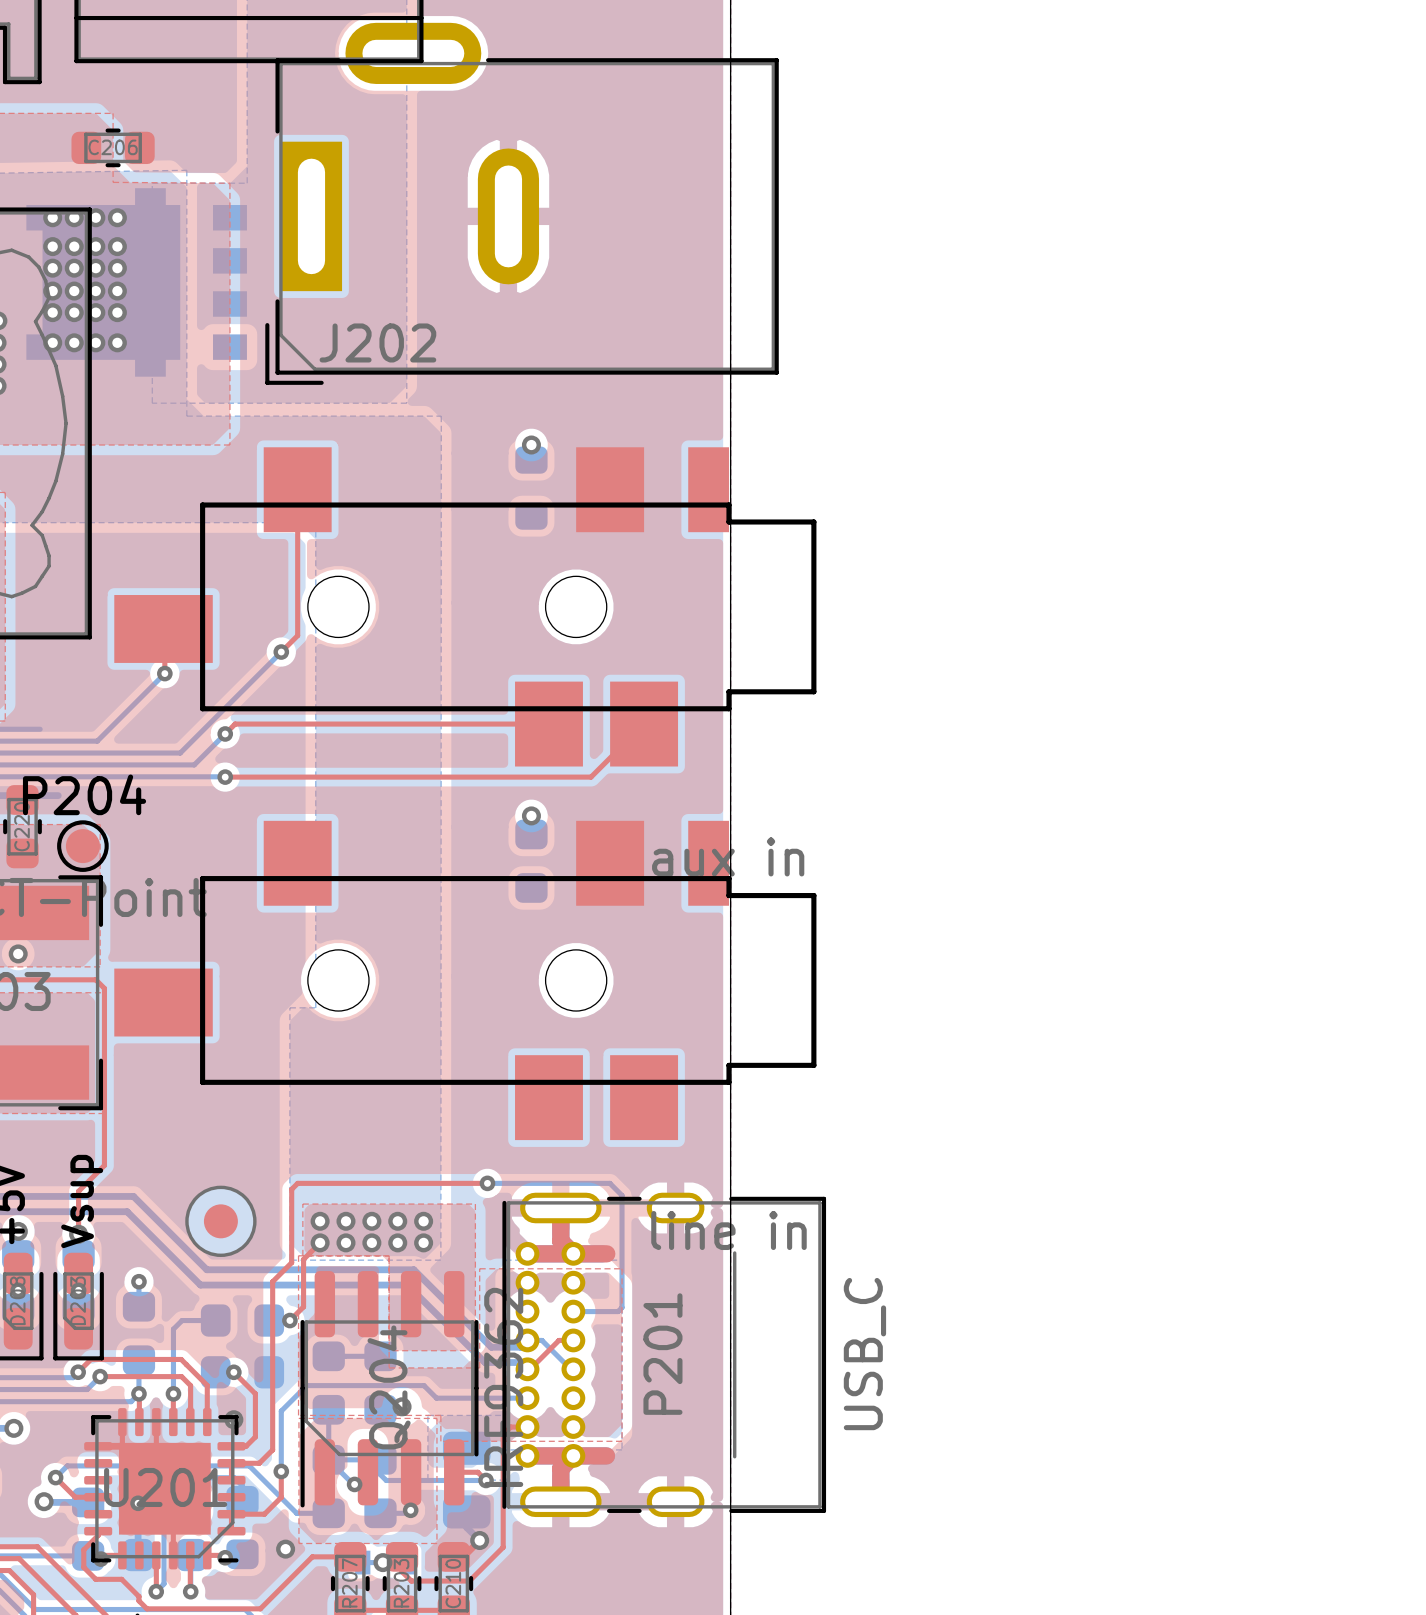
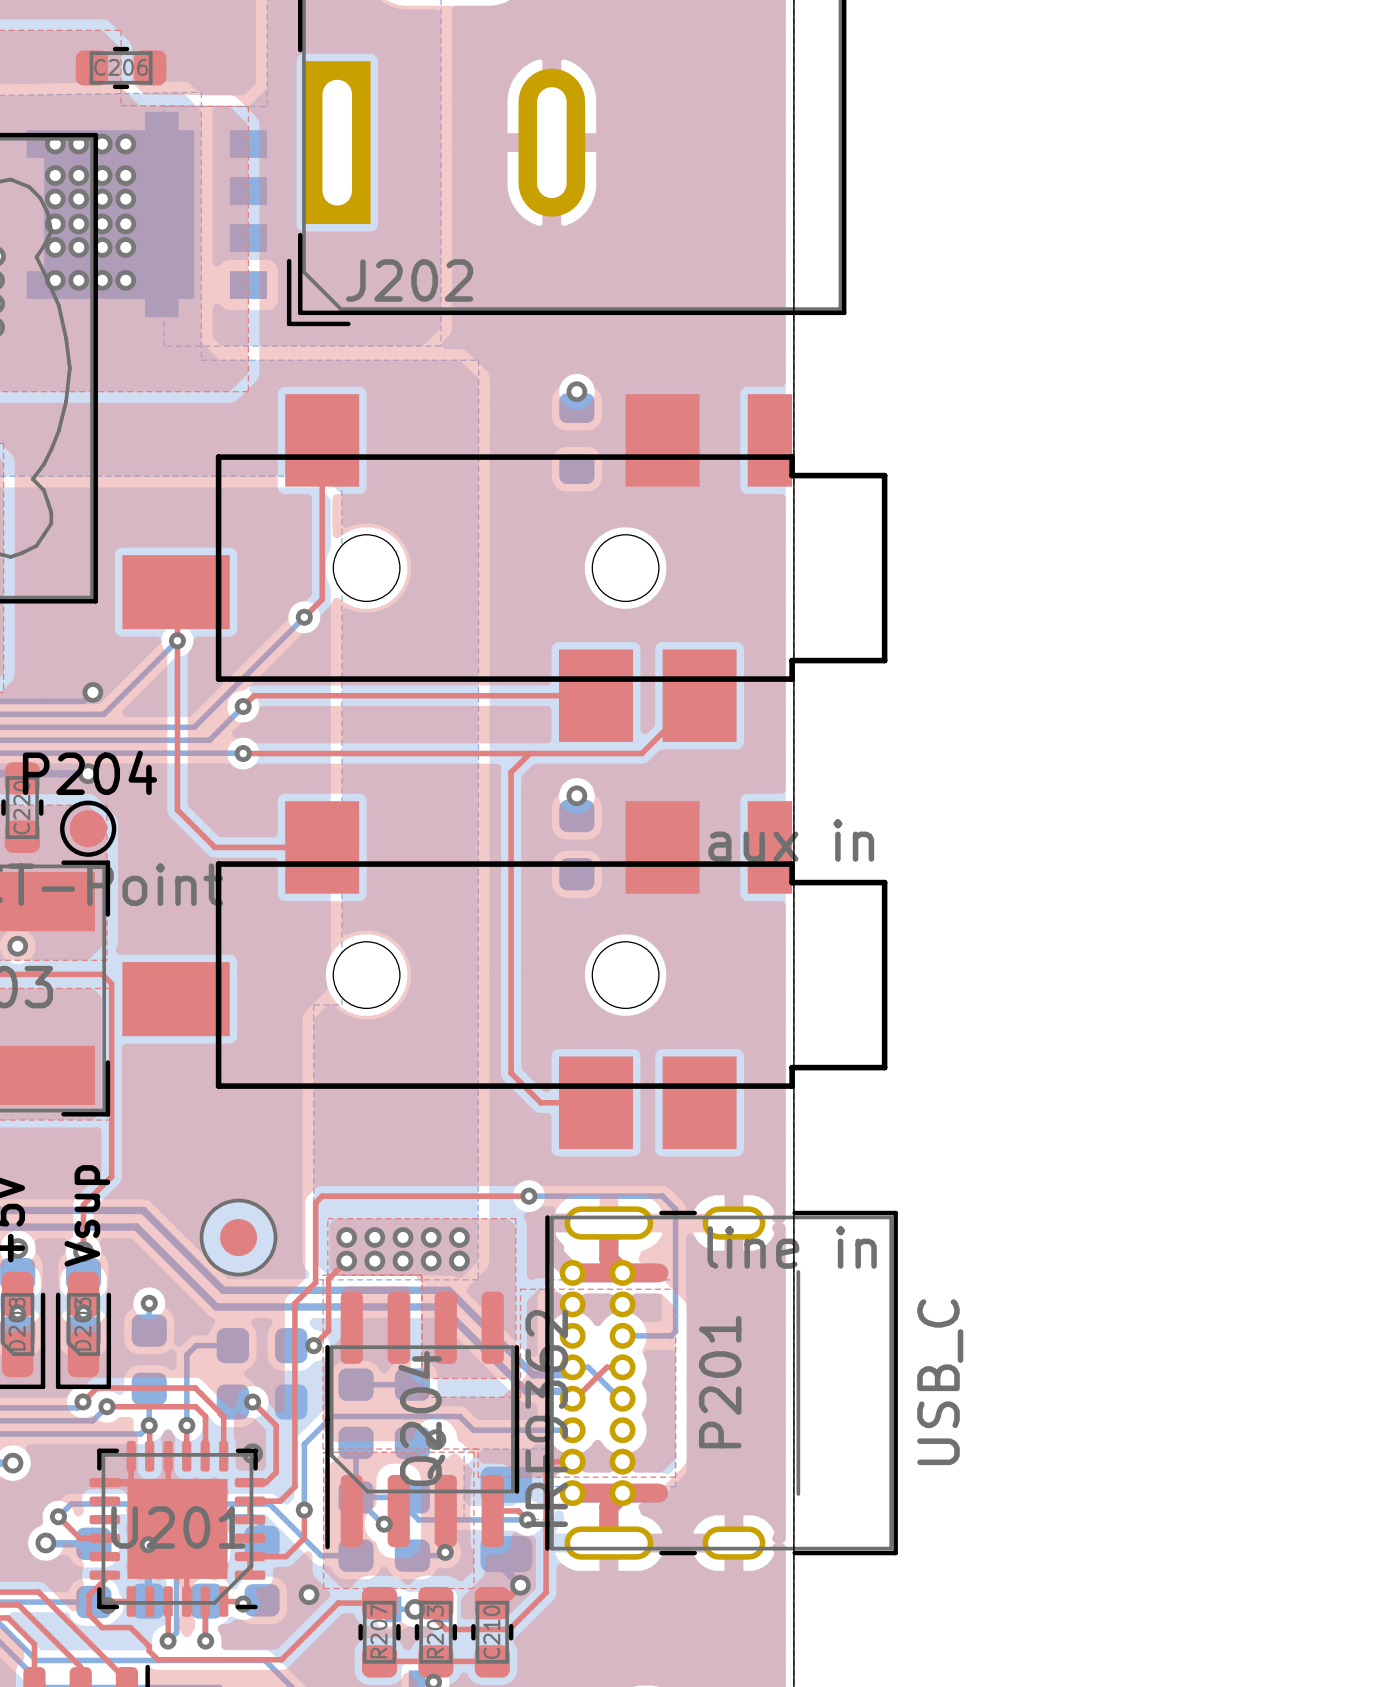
top track: none -> (177, 640) (177, 809) (214, 847) (322, 847)
via: none -> (92, 692)
top track: none -> (529, 753) (511, 772) (511, 1073) (540, 1102) (596, 1102)
via: none -> (88, 773)

